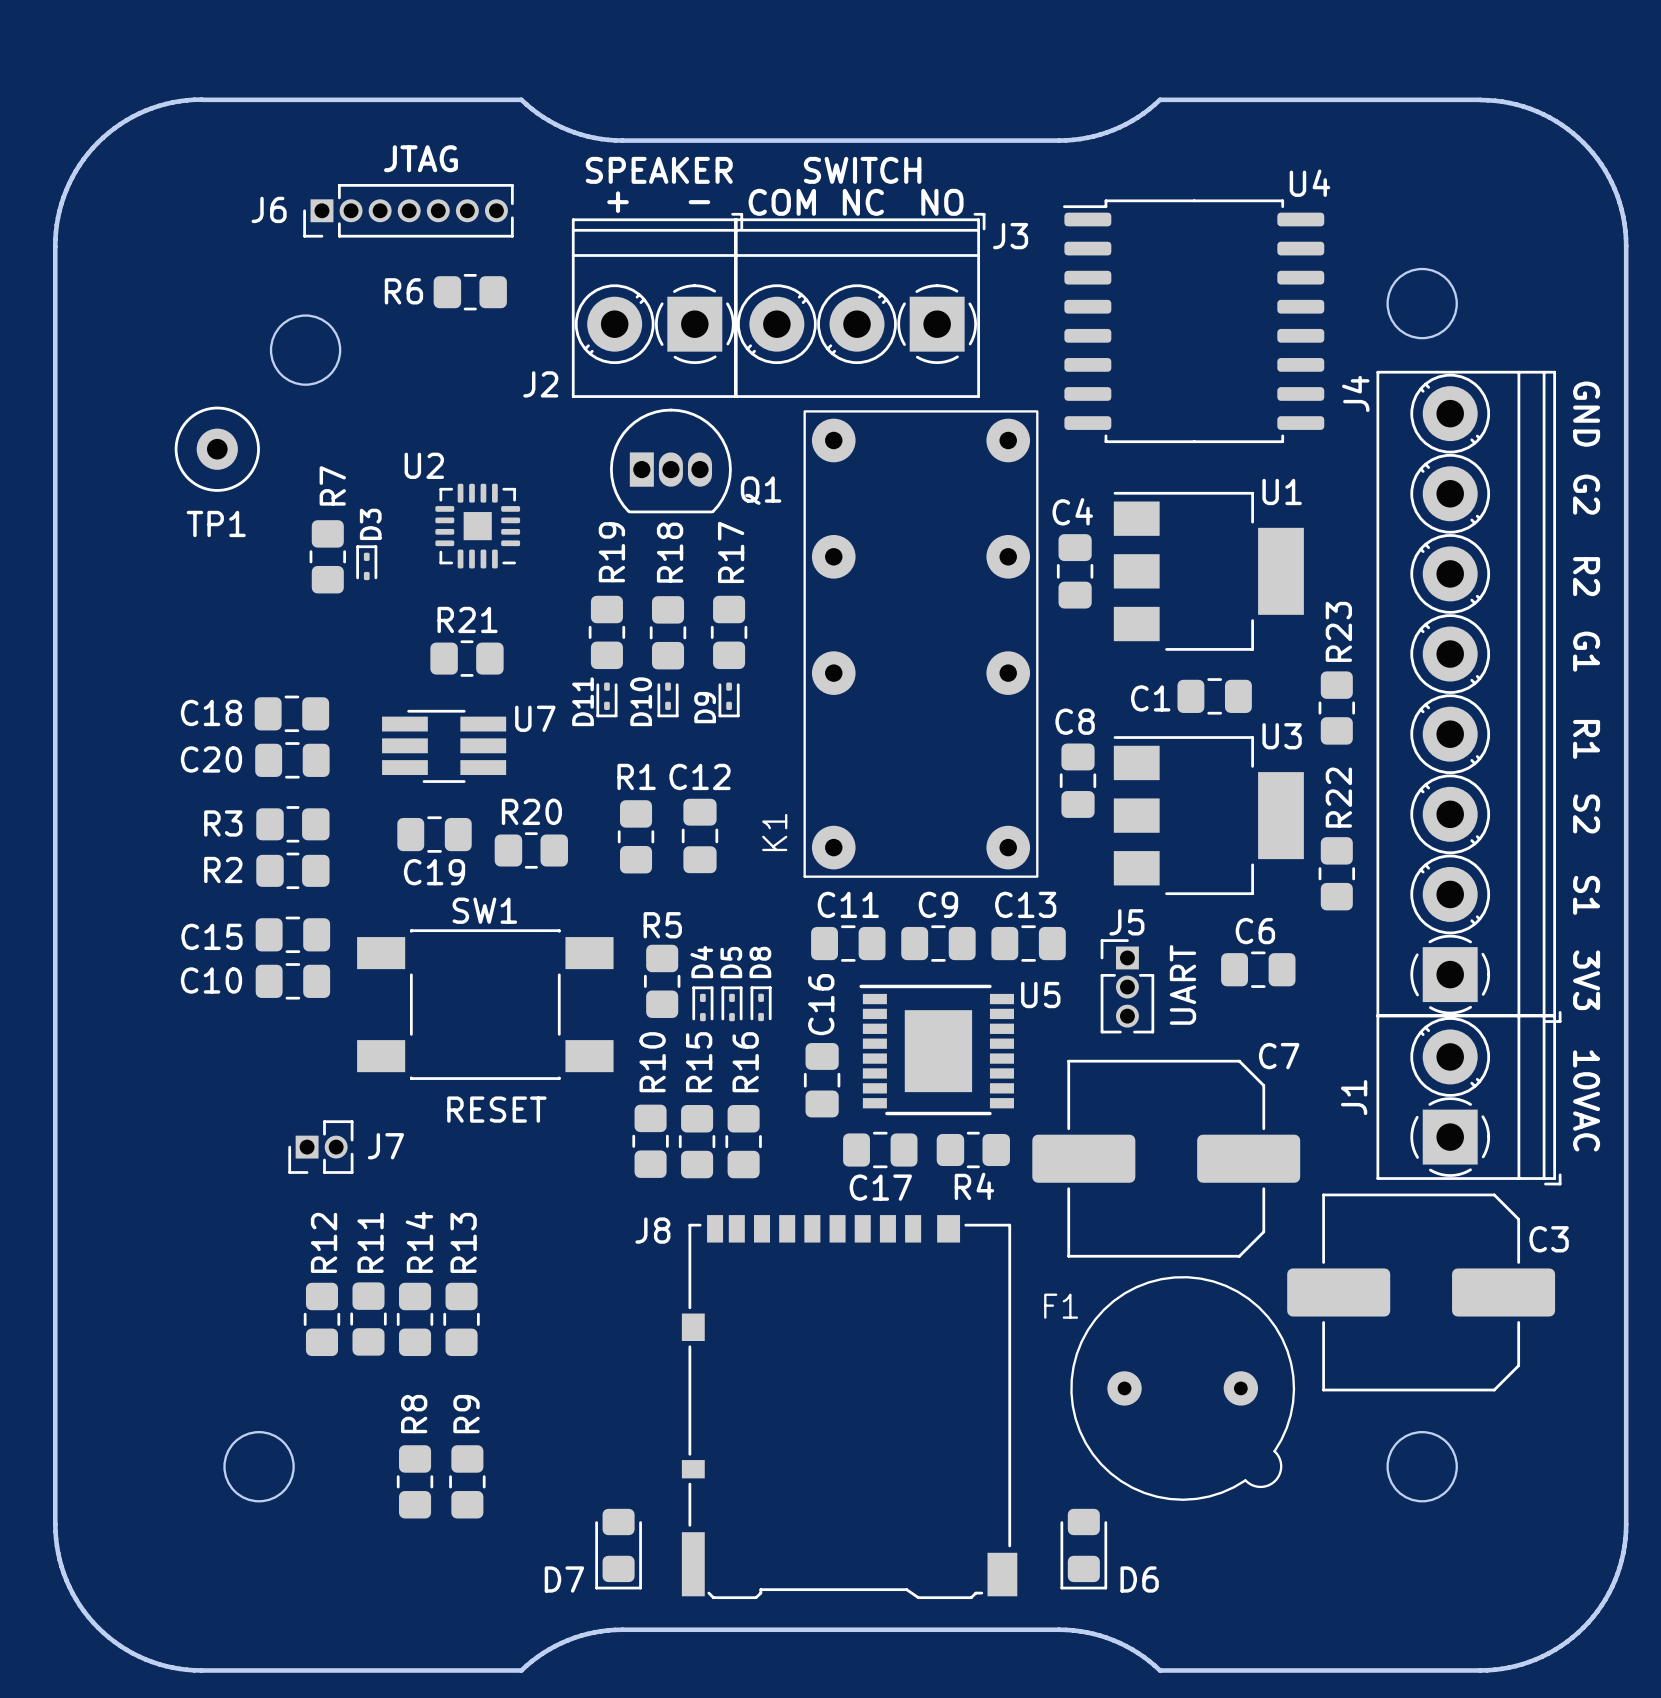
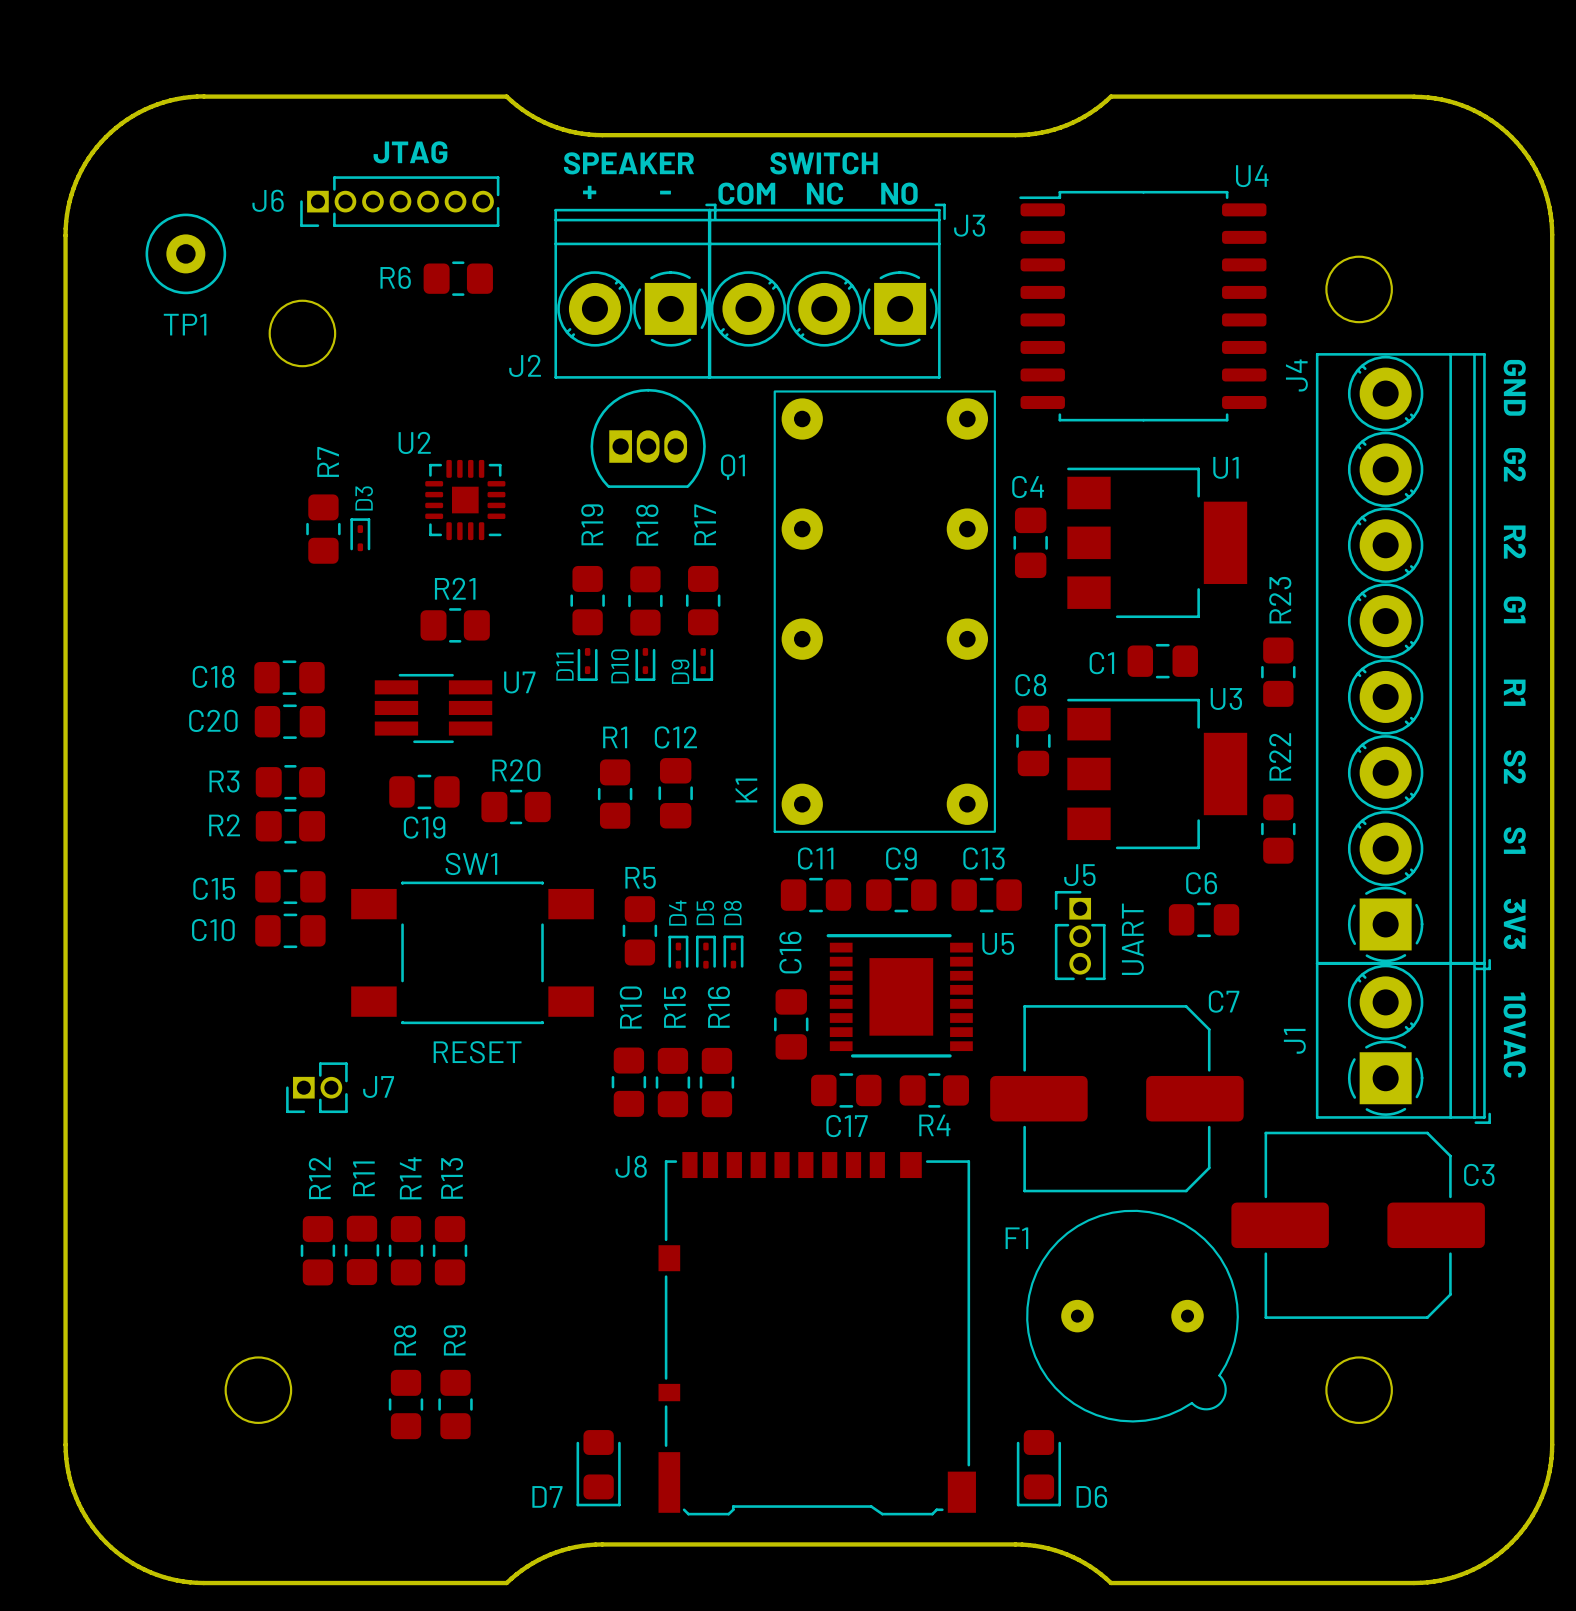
TP1 position: (217, 449) -> (185, 253)

